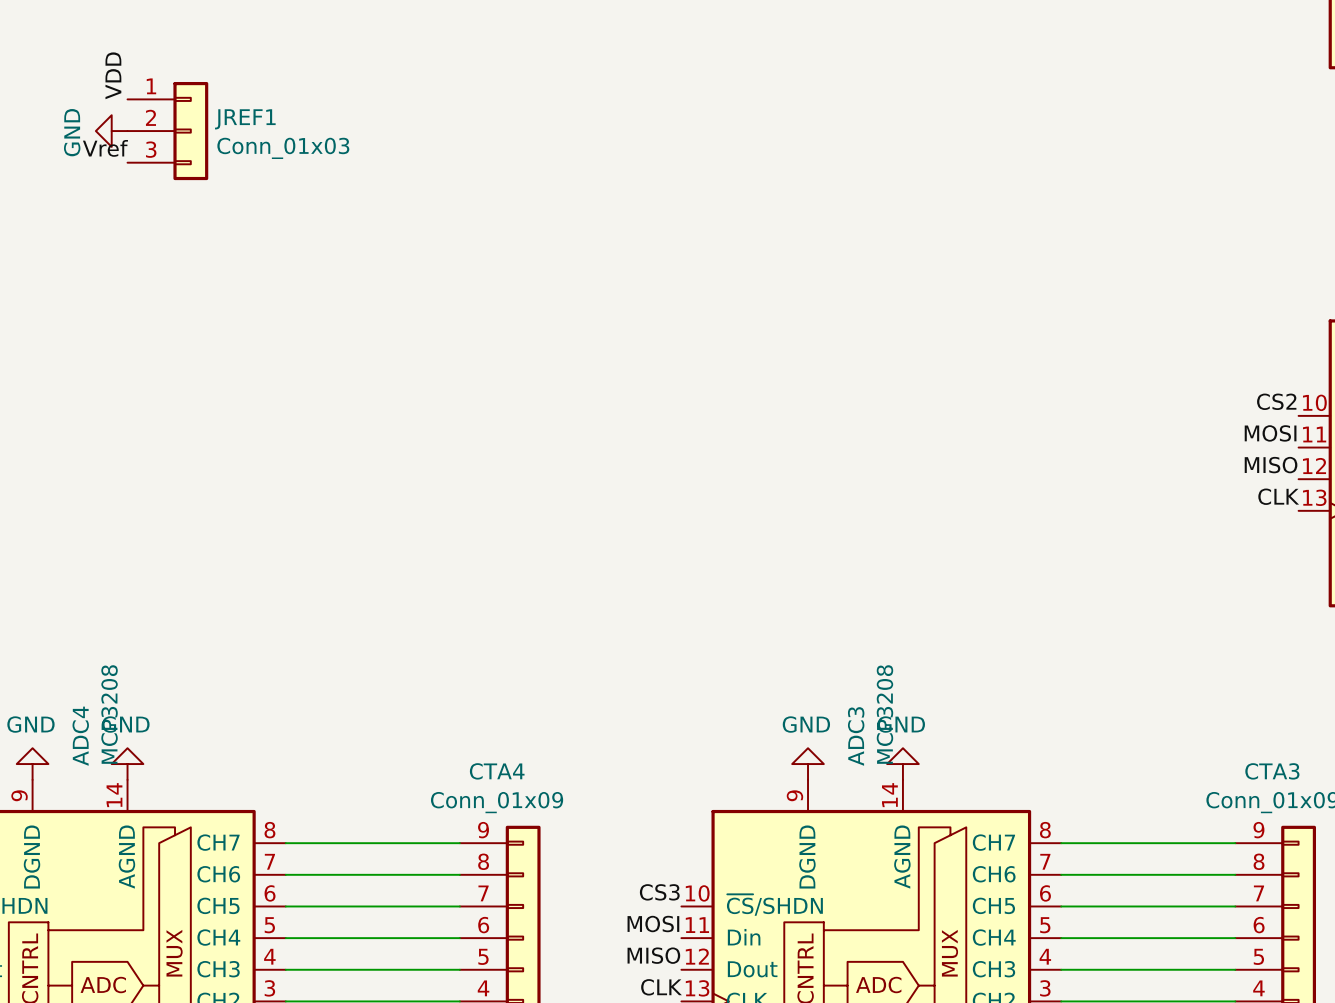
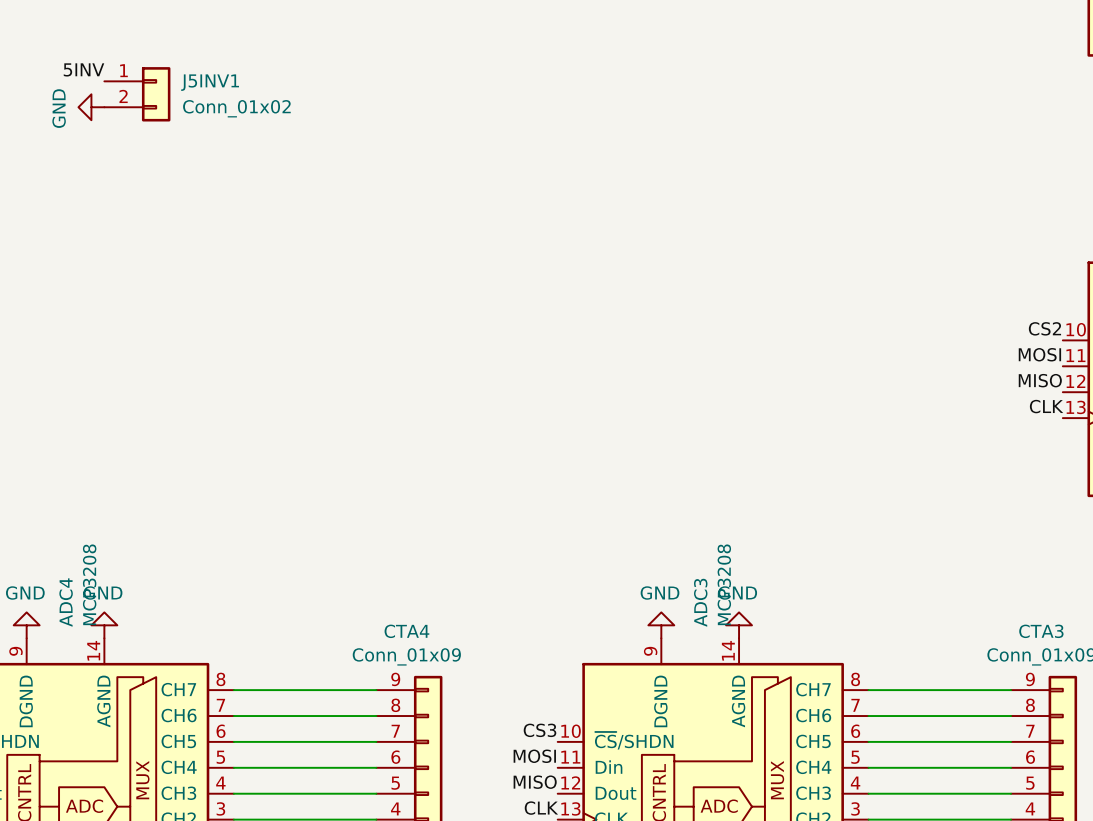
label: VDD (113, 75) -> 5INV (84, 69)
J5INV1: none -> Conn_01x02 (137, 94)
JREF1: Conn_01x03 (167, 131) -> none
label: Vref (105, 148) -> none

